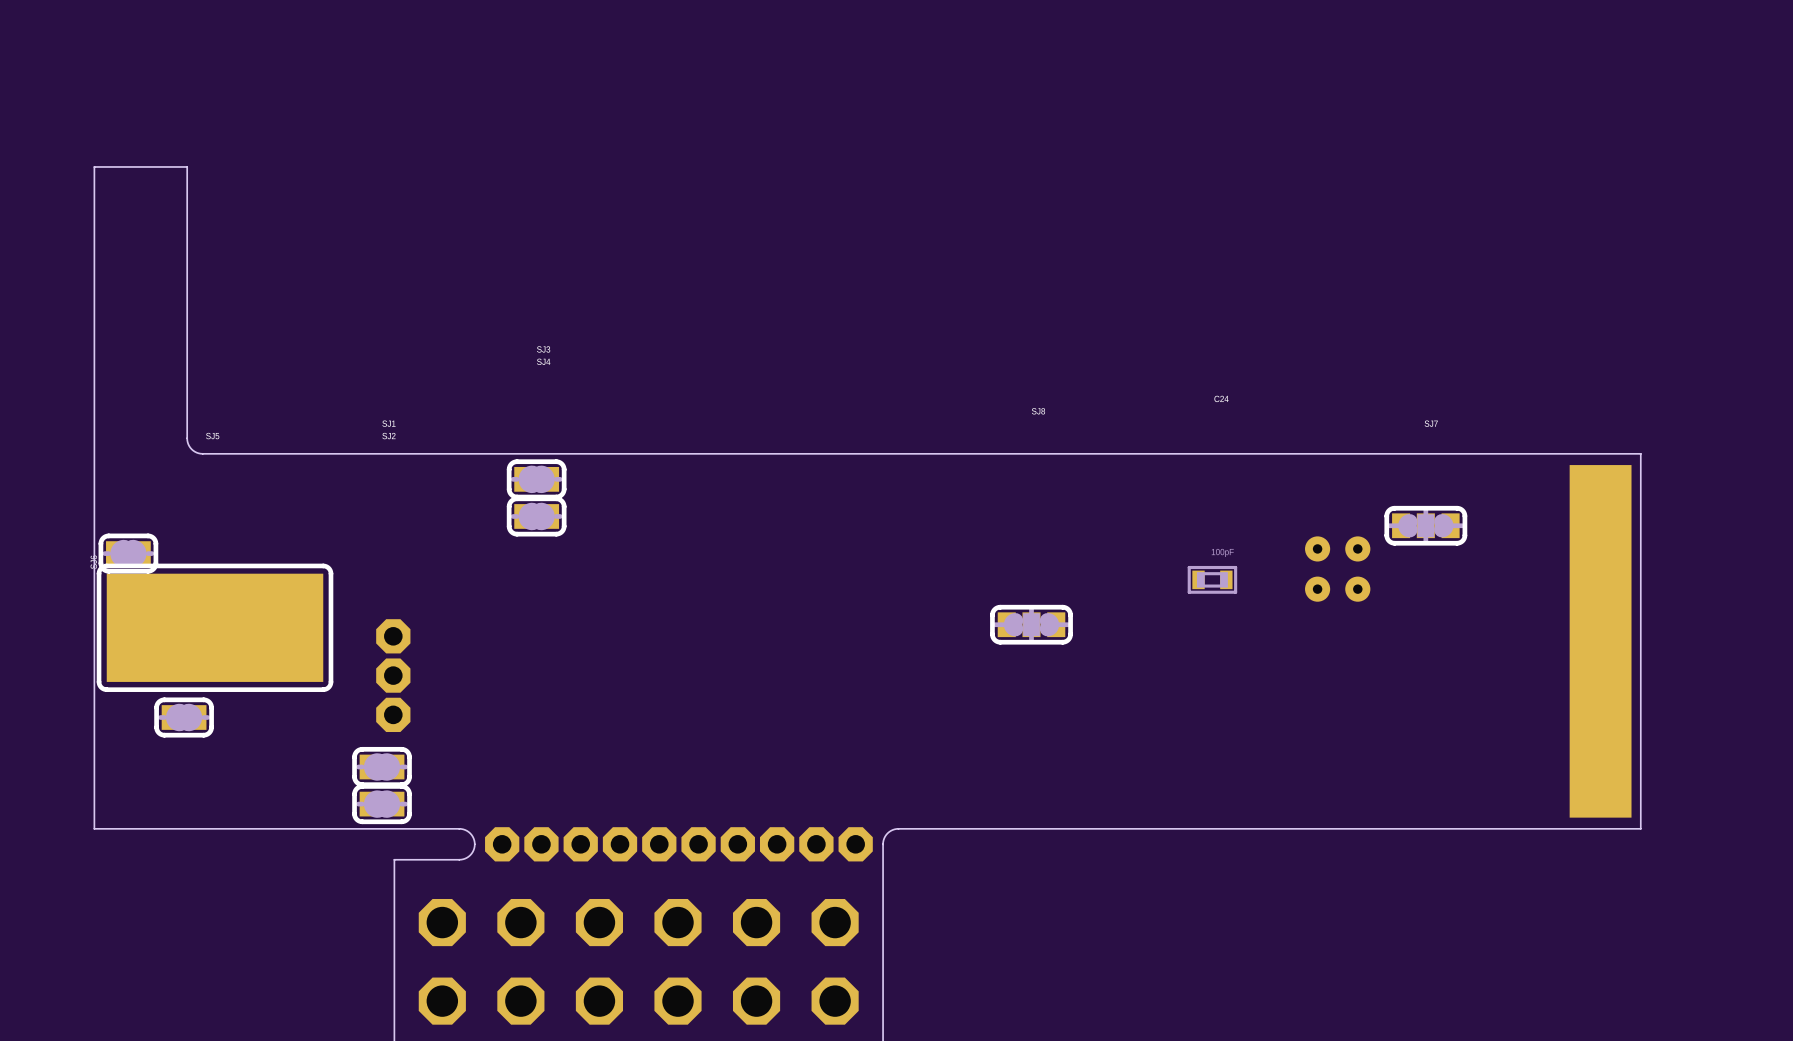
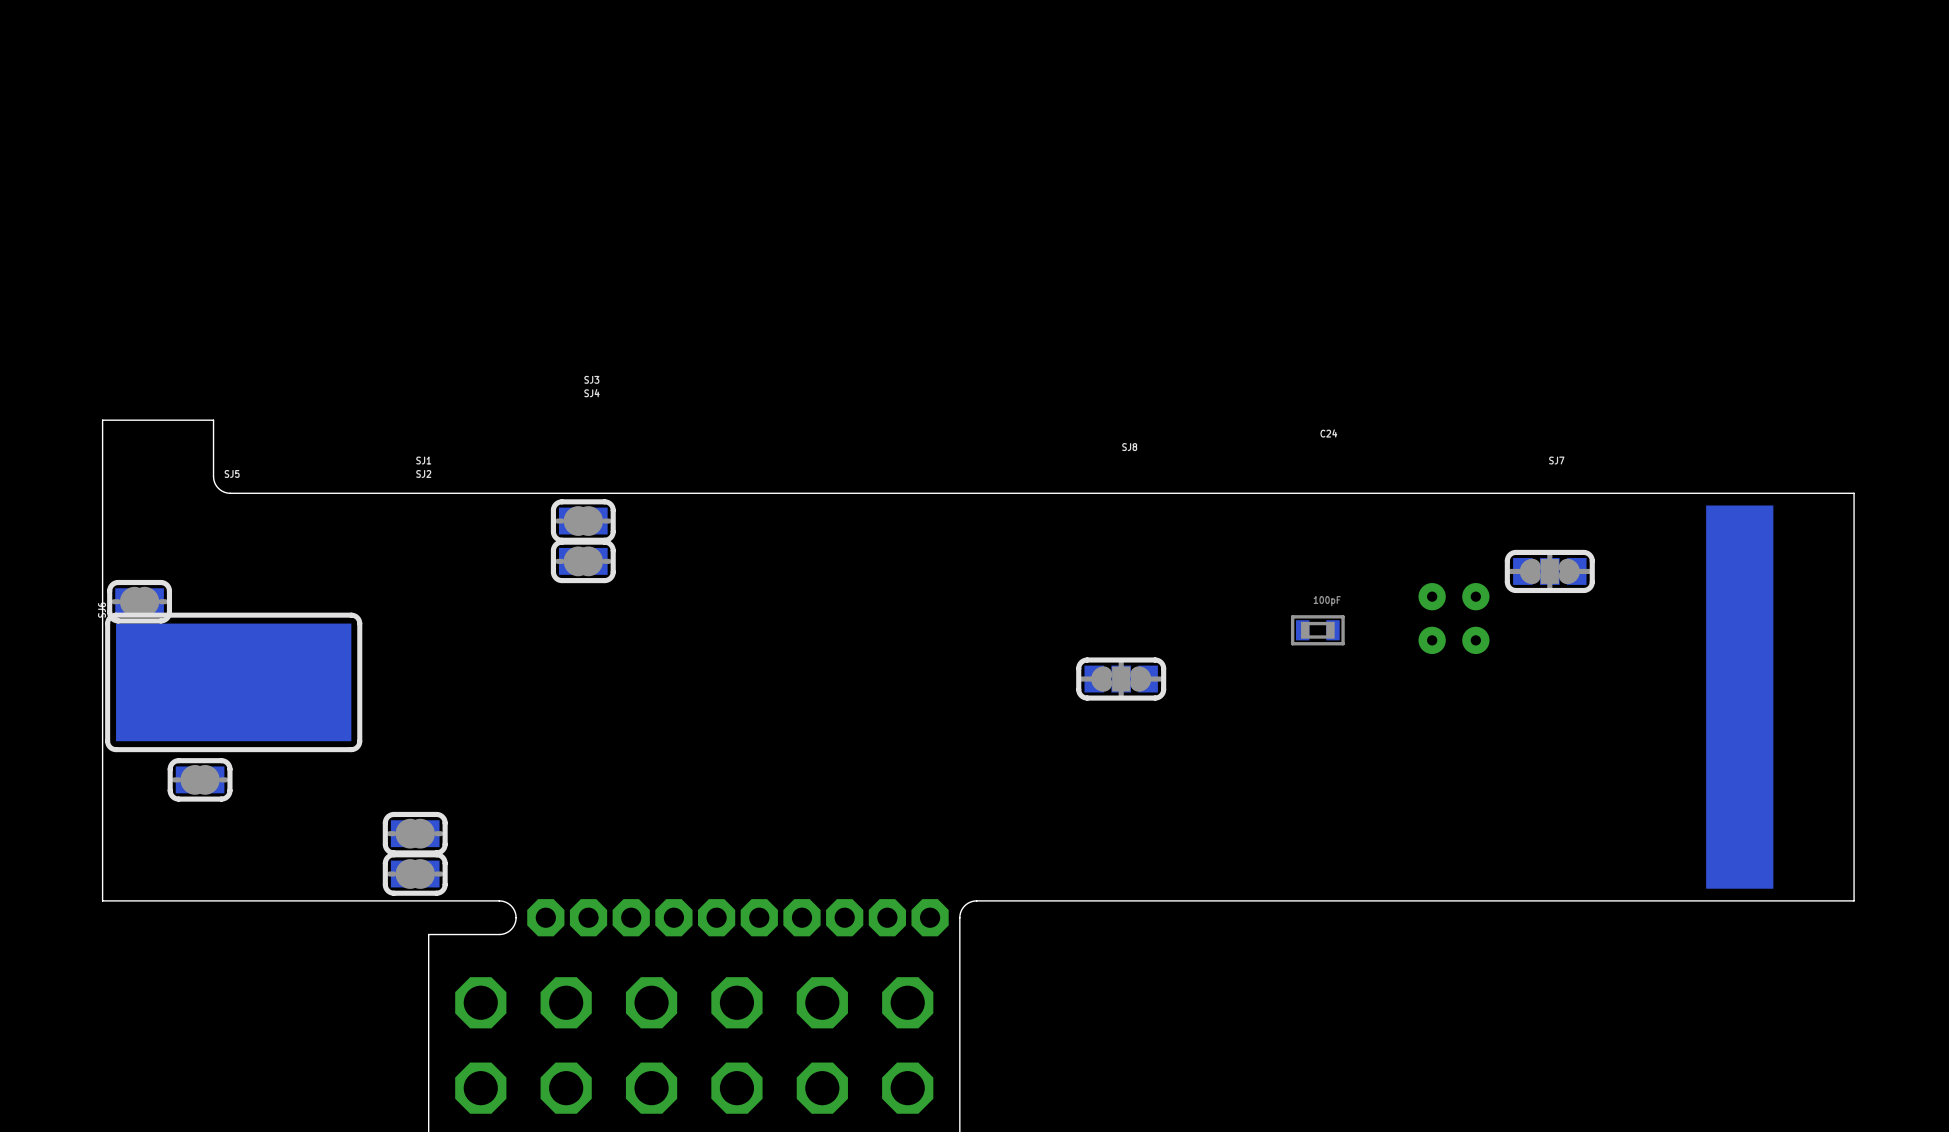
board edge: (94, 386) (94, 166) (187, 166) (187, 440) (189, 446) (194, 451) (211, 453) -> (102, 420) (213, 420) (214, 480) (220, 489) (230, 493)
board edge: (1640, 453) (1640, 828) -> (1783, 493) (1854, 493) (1854, 900) (1783, 900)
part: (393, 675) -> none

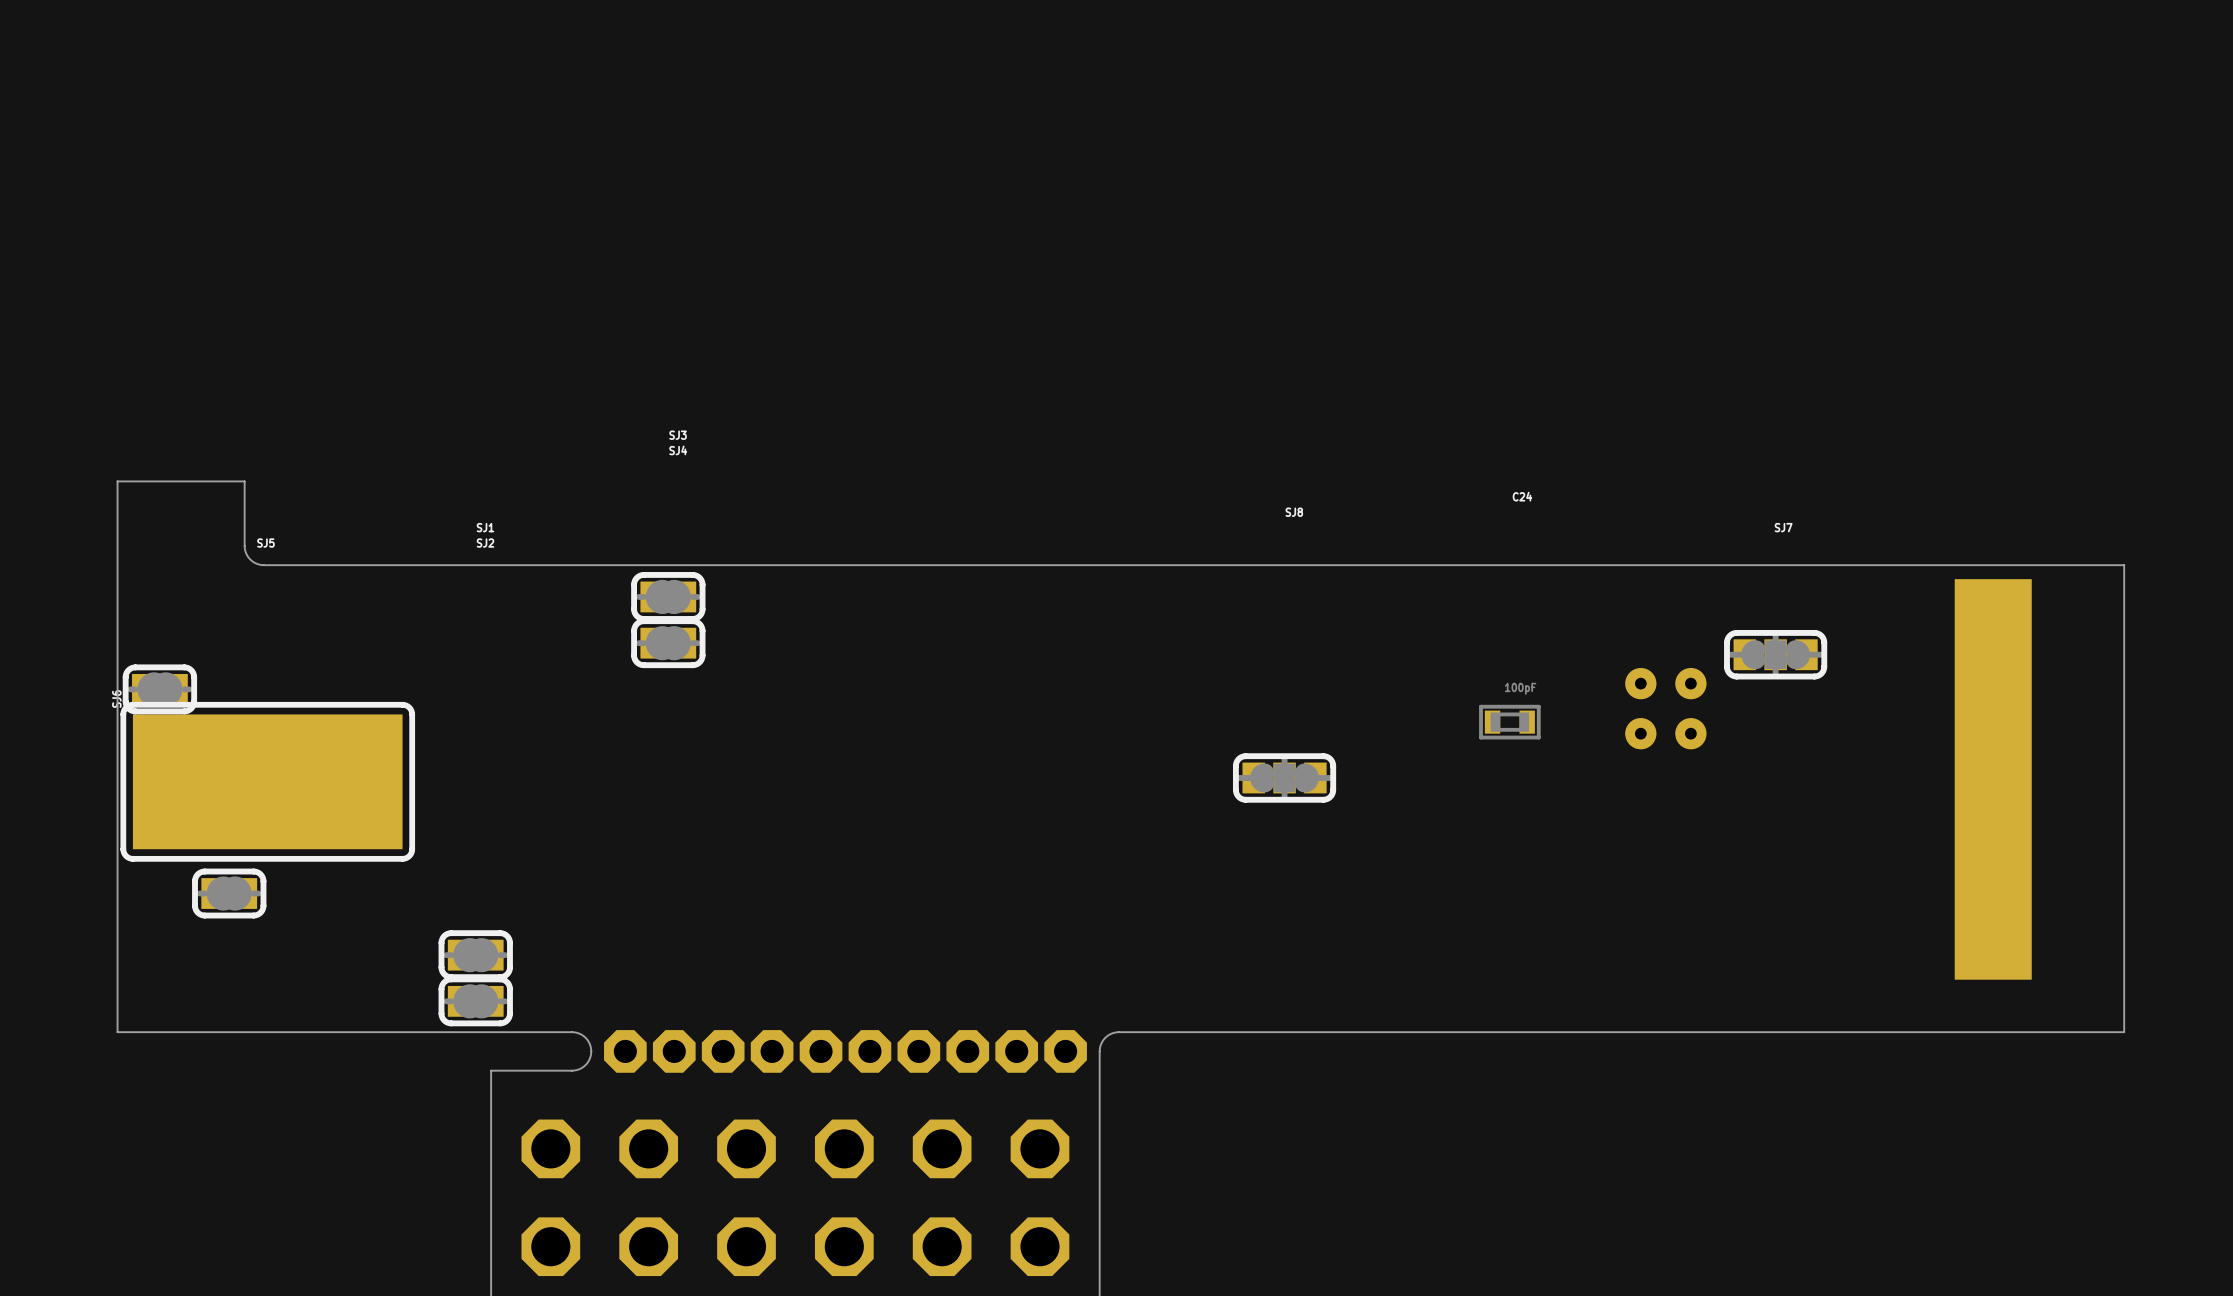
part footprint: [1706, 505, 1774, 889] -> [1954, 579, 2032, 980]

